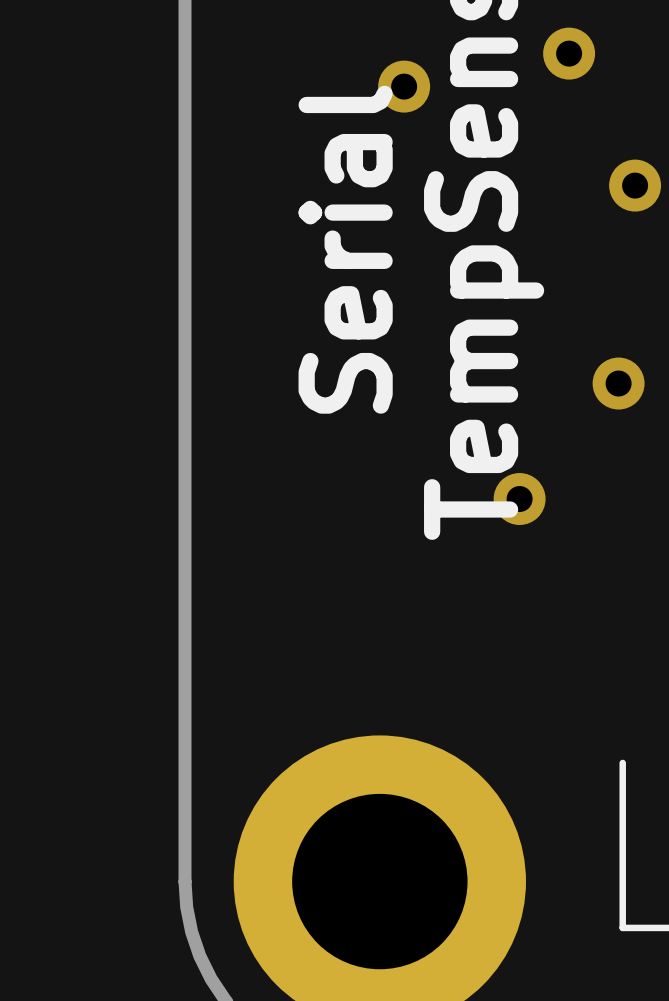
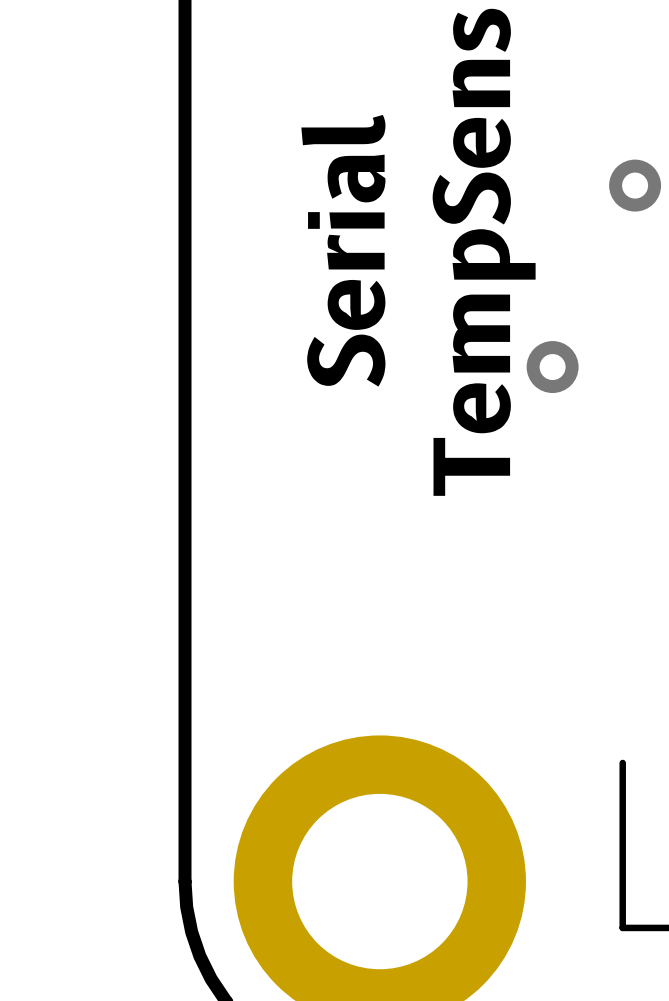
via: (569, 53) -> none
via: (404, 86) -> none
via: none -> (552, 367)
via: (618, 383) -> none
via: (519, 499) -> none

